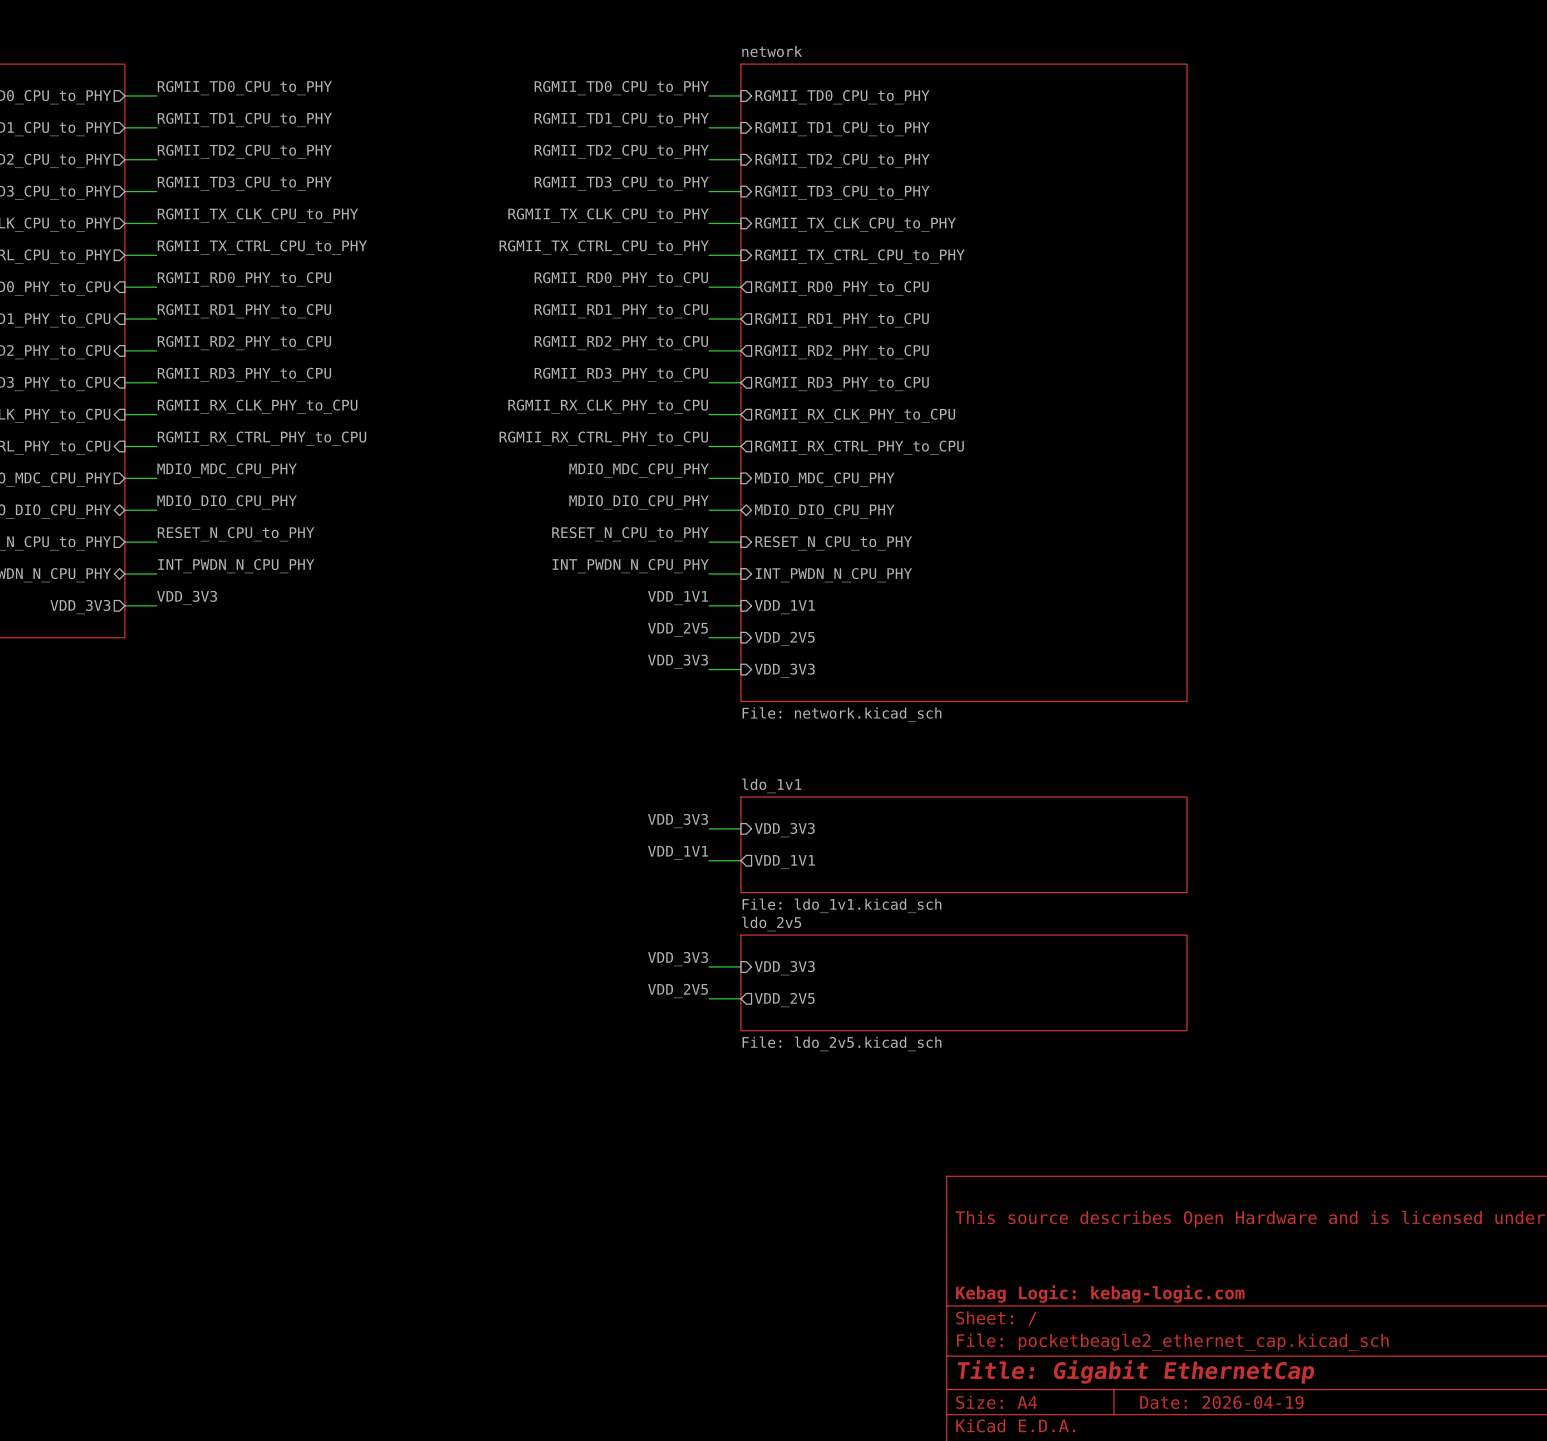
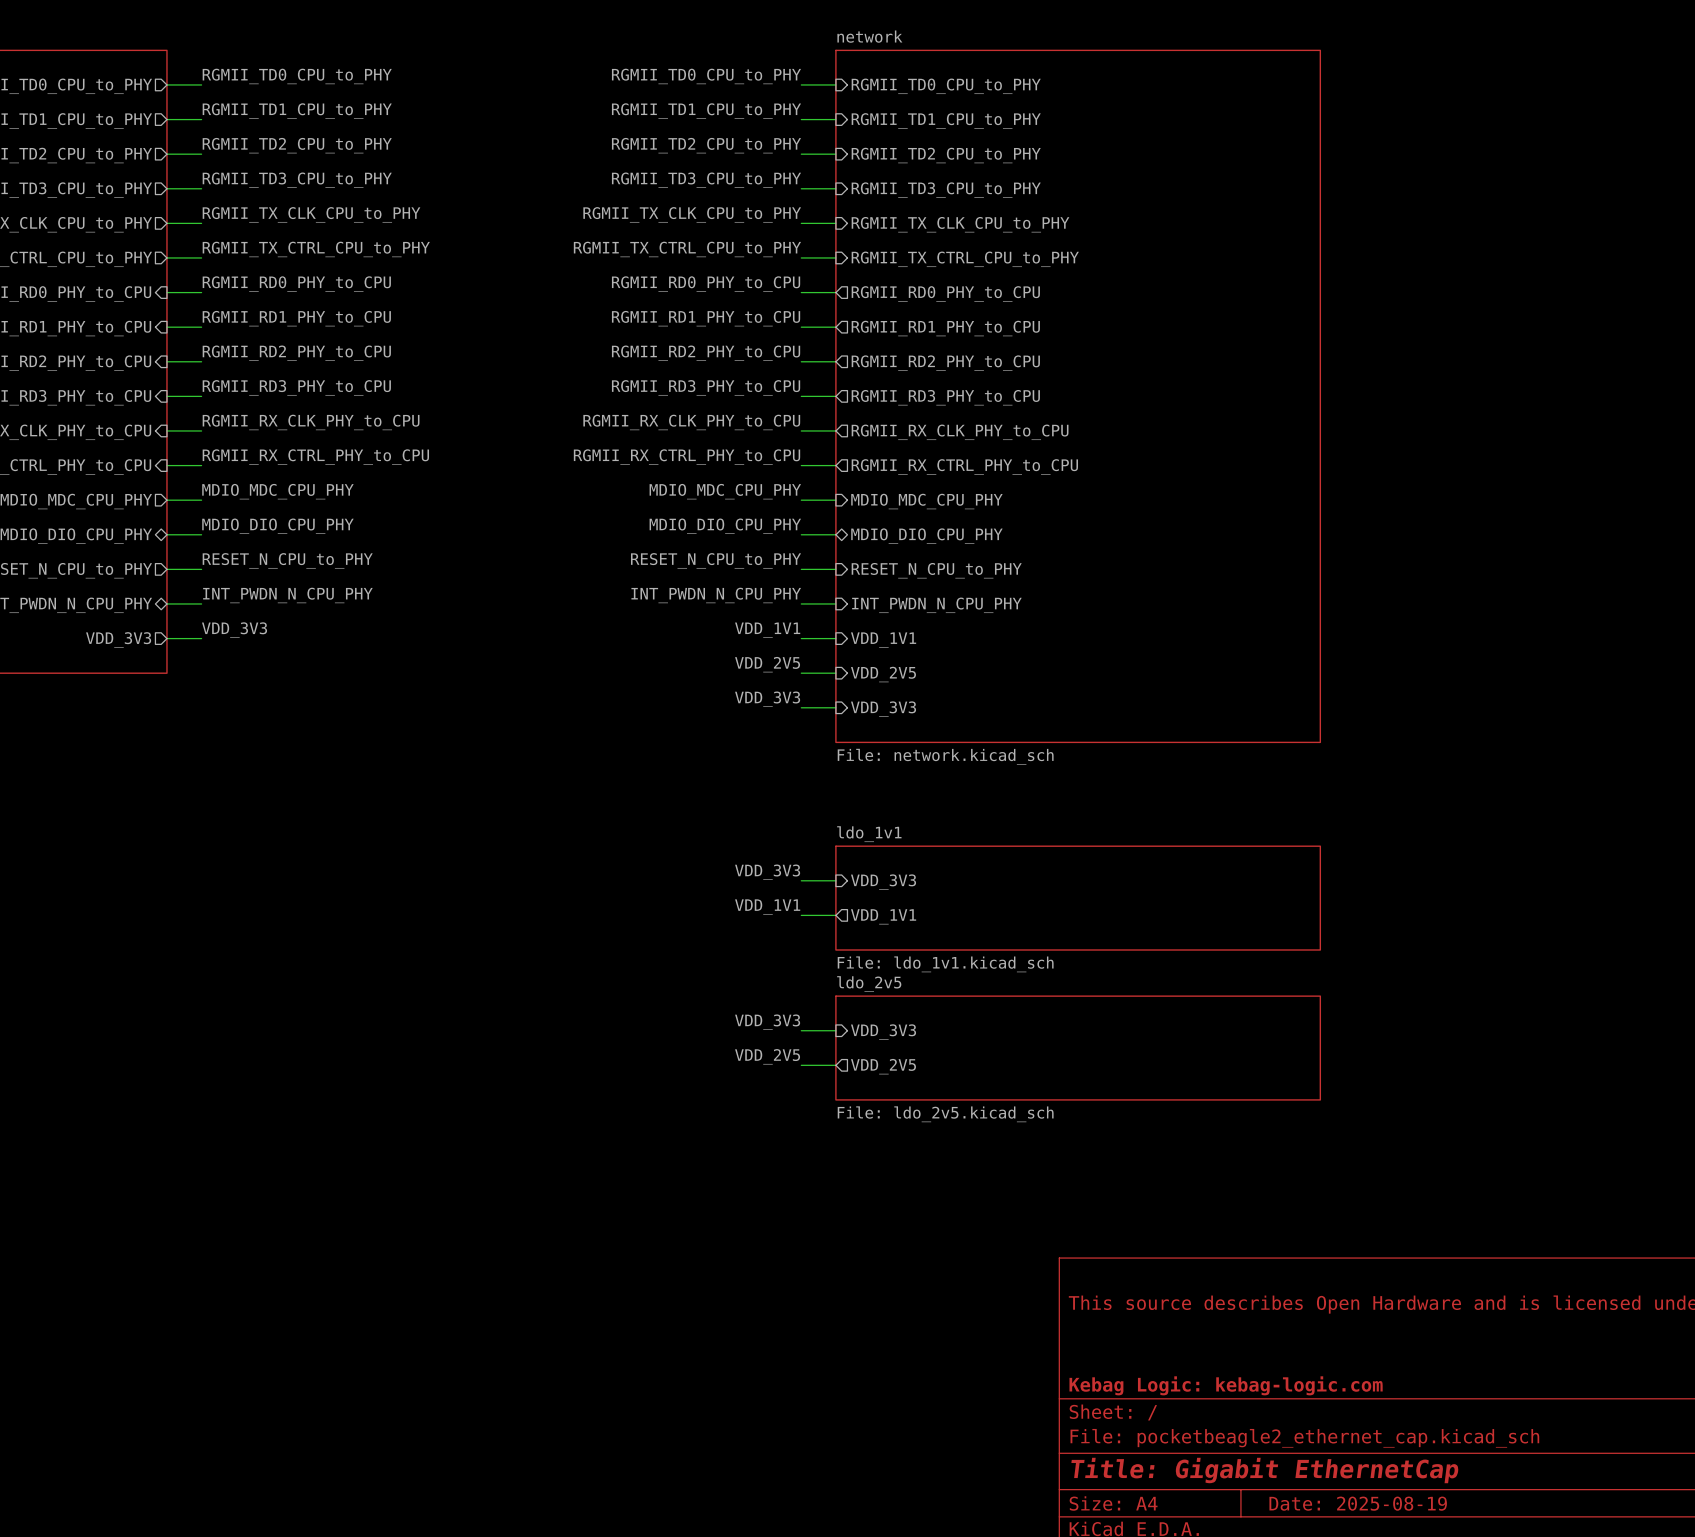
title block: Date: 2026-04-19 (1221, 1402) -> Date: 2025-08-19 (1358, 1503)

